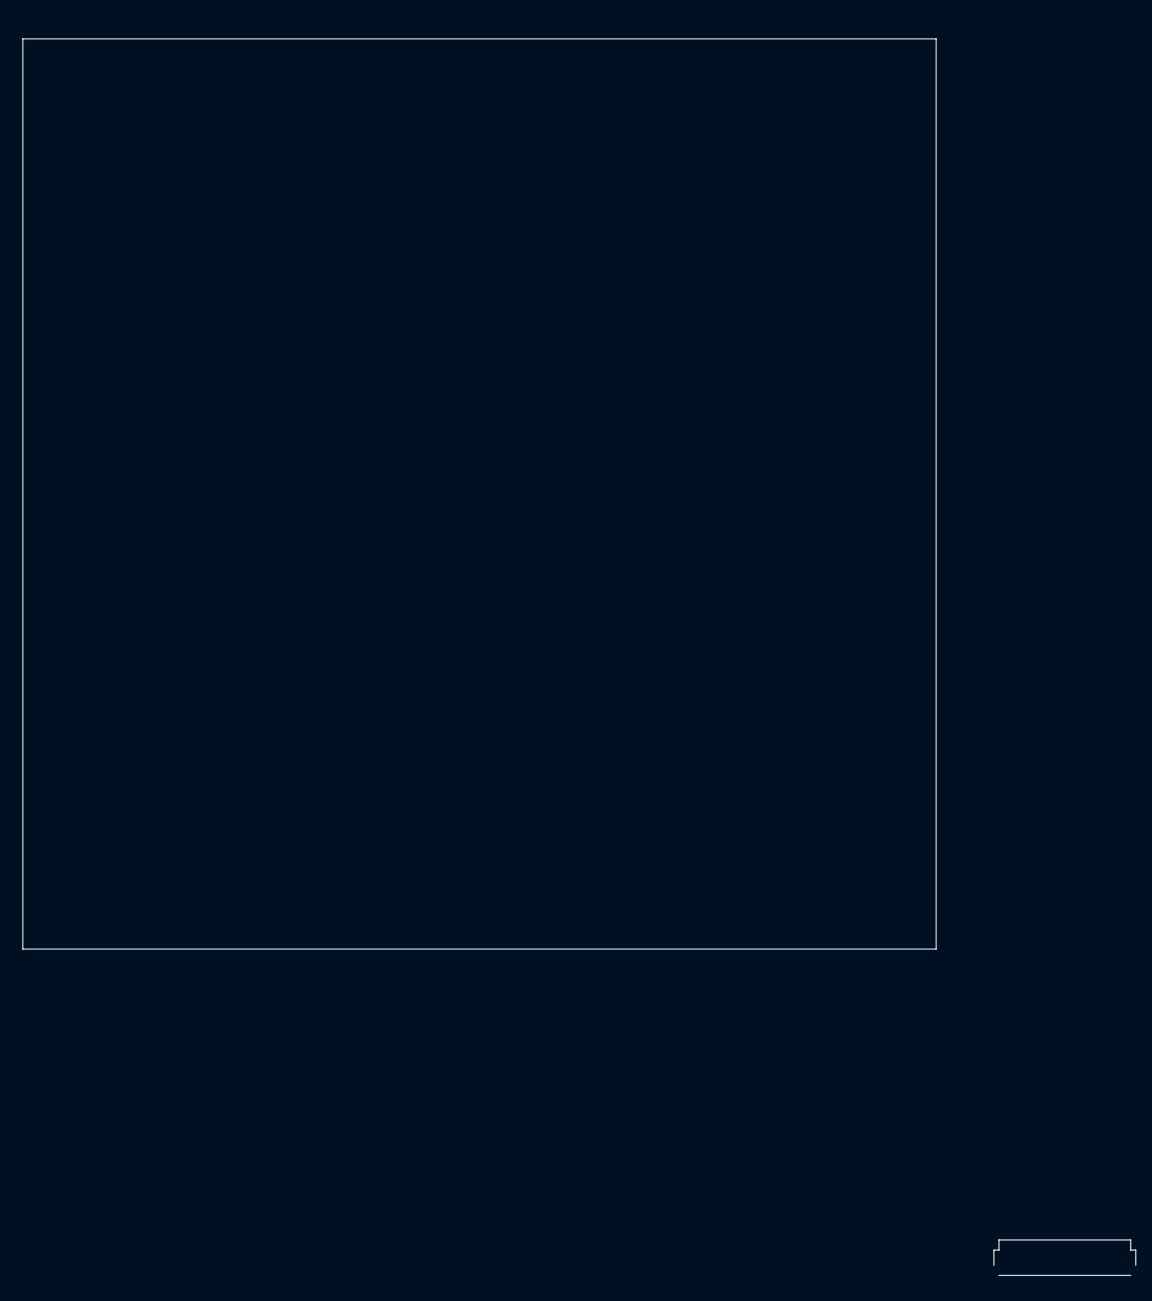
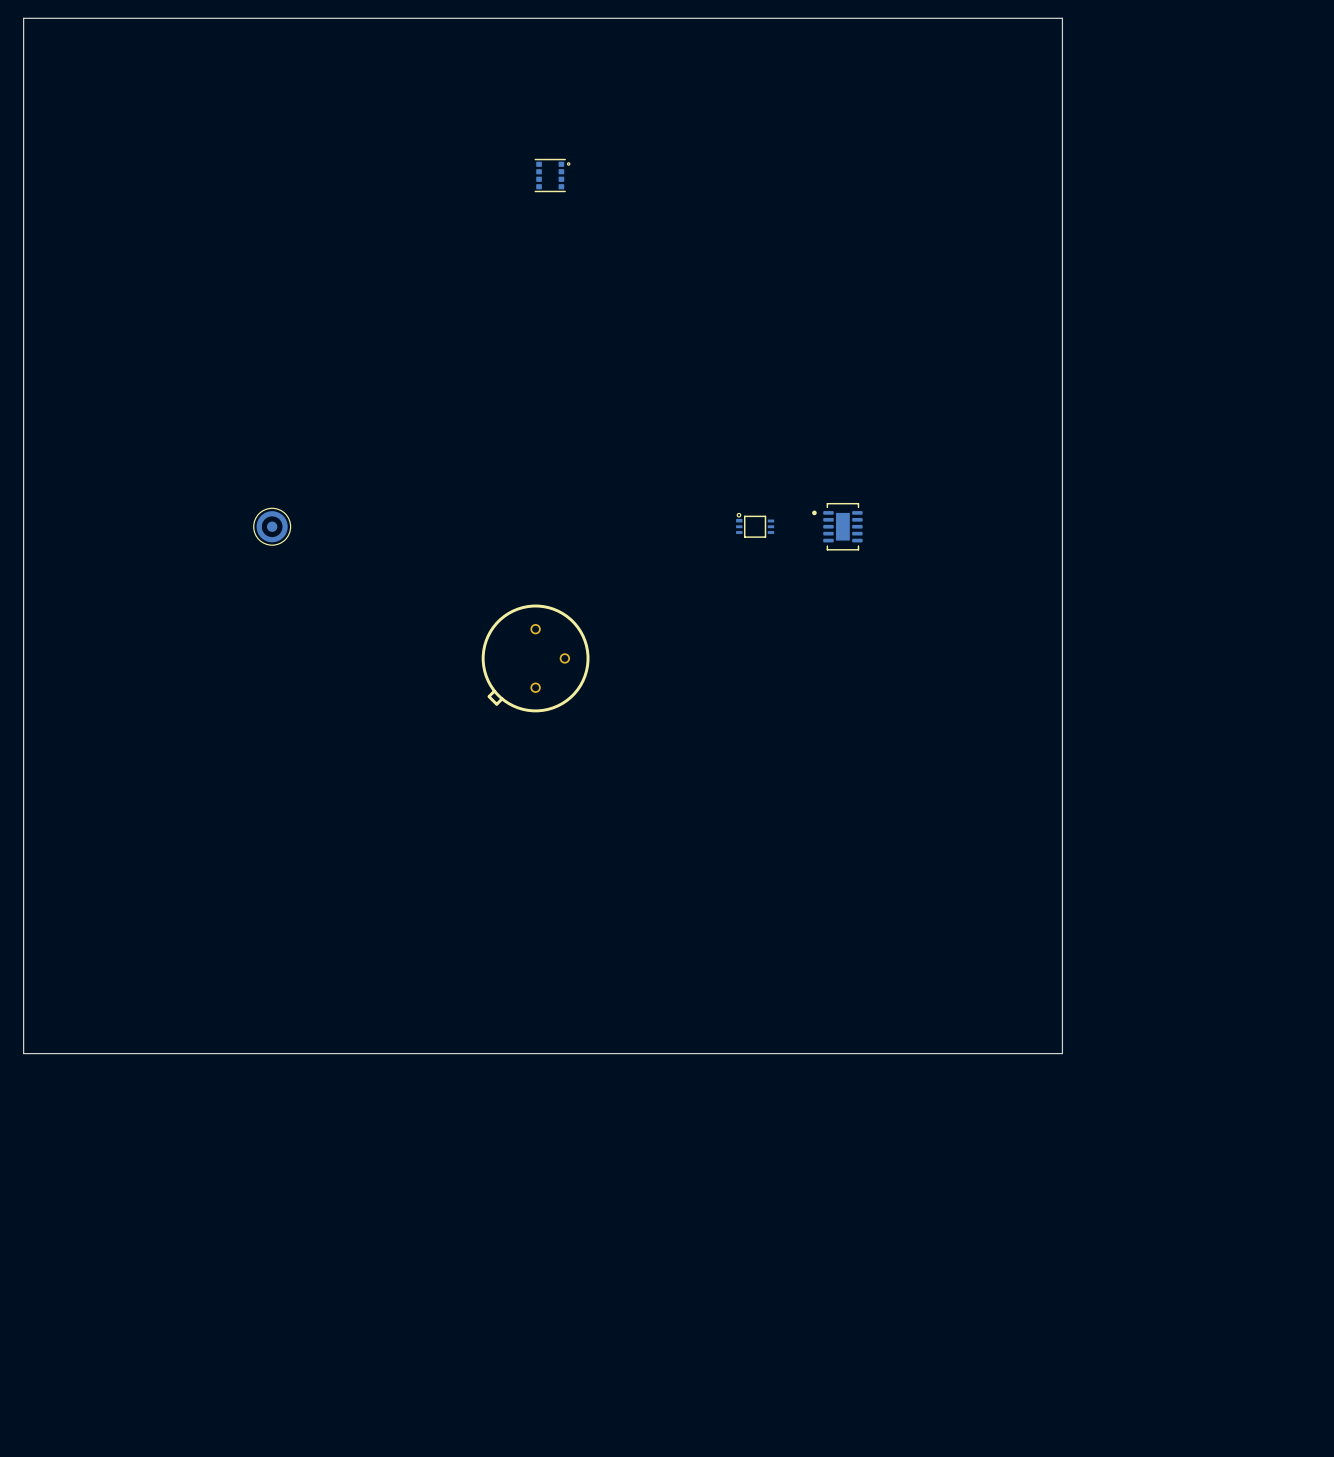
part: none -> (552, 175)
part: none -> (755, 525)
part: none -> (272, 526)
part: none -> (837, 526)
part: none -> (535, 658)
part: (1064, 1257) -> none

